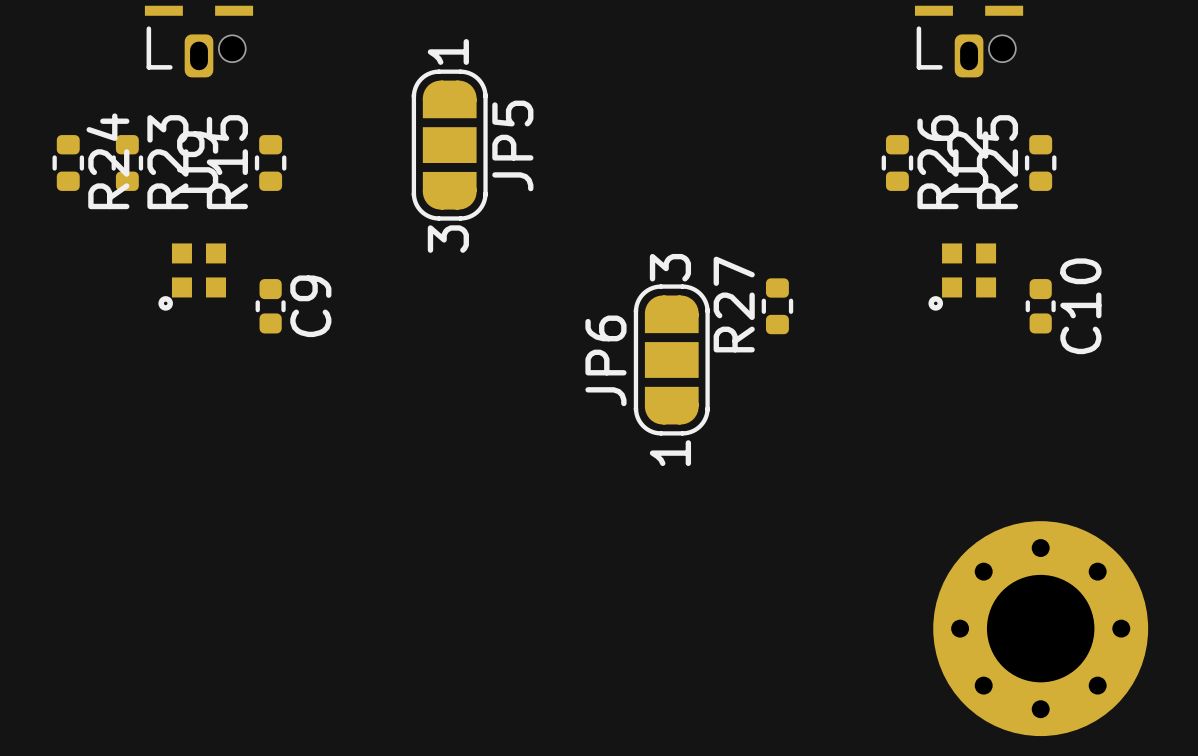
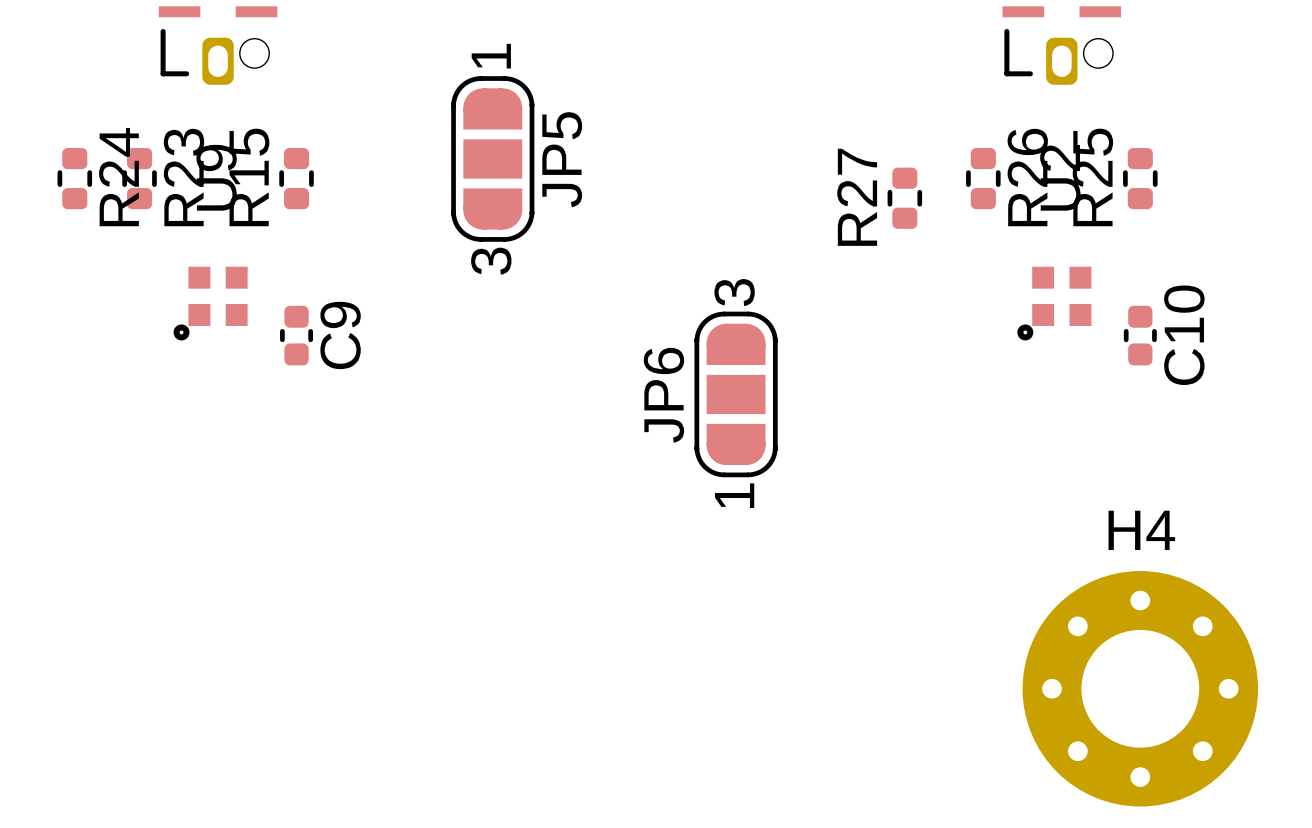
R27 position: (777, 306) -> (904, 198)
H4 name: none -> H4 (1141, 530)

